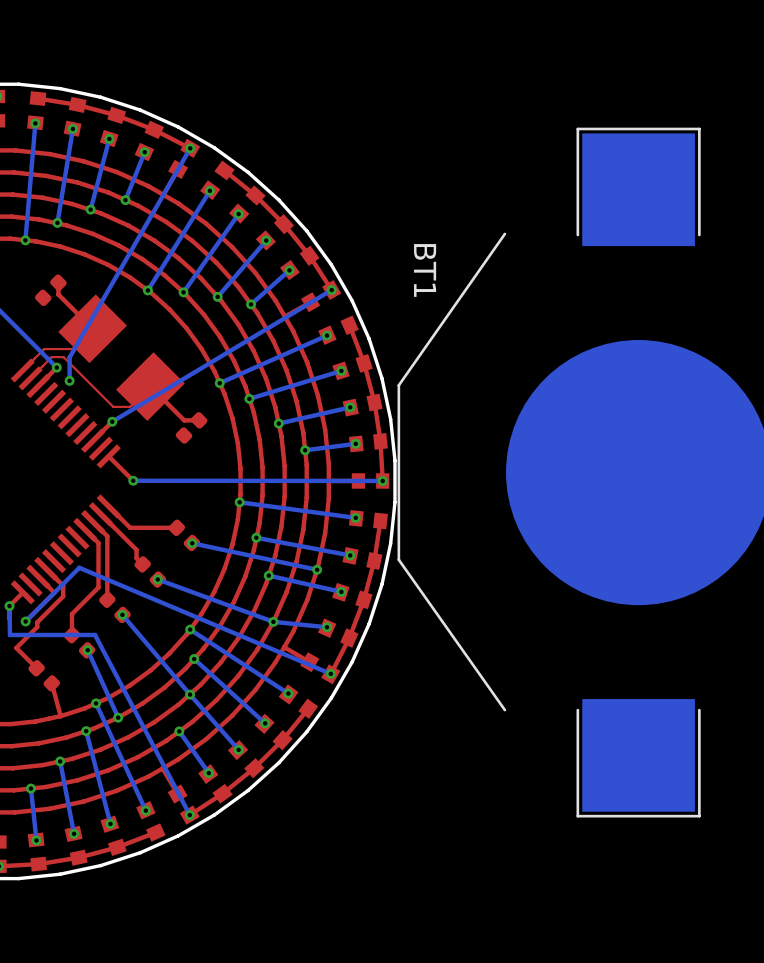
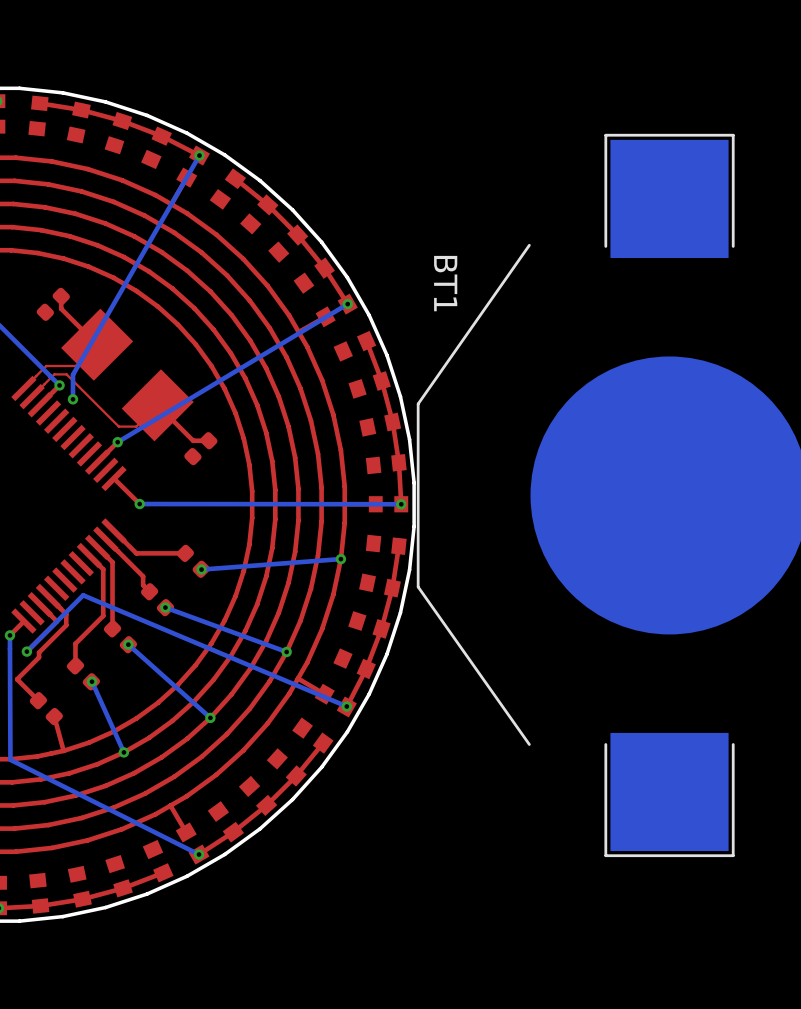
bottom track: (35, 123) (25, 240) -> none
via: (35, 123) -> none
bottom track: (72, 128) (57, 222) -> none
via: (72, 128) -> none
bottom track: (109, 138) (90, 209) -> none
via: (109, 138) -> none
bottom track: (144, 152) (125, 200) -> none
via: (144, 152) -> none
bottom track: (209, 190) (147, 290) -> none
via: (209, 190) -> none
via: (125, 200) -> none
via: (90, 209) -> none
bottom track: (238, 214) (183, 292) -> none
via: (238, 214) -> none
via: (57, 222) -> none
via: (25, 240) -> none
bottom track: (266, 240) (217, 296) -> none
via: (266, 240) -> none
bottom track: (289, 270) (251, 304) -> none
via: (289, 270) -> none
via: (147, 290) -> none
via: (183, 292) -> none
via: (217, 296) -> none
via: (251, 304) -> none
bottom track: (327, 335) (219, 383) -> none
via: (327, 335) -> none
bottom track: (341, 370) (249, 398) -> none
via: (341, 370) -> none
via: (219, 383) -> none
via: (249, 398) -> none
bottom track: (350, 407) (278, 423) -> none
via: (350, 407) -> none
via: (278, 423) -> none
bottom track: (355, 443) (305, 450) -> none
via: (355, 443) -> none
via: (305, 450) -> none
bottom track: (239, 502) (355, 517) -> none
via: (239, 502) -> none
via: (355, 517) -> none
via: none -> (340, 559)
bottom track: (256, 537) (350, 555) -> none
via: (256, 537) -> none
bottom track: (192, 543) (317, 569) -> (201, 569) (340, 559)
via: (350, 555) -> none
via: (317, 569) -> none
bottom track: (268, 575) (341, 591) -> none
via: (268, 575) -> none
via: (341, 591) -> none
bottom track: (9, 606) (9, 634) (95, 634) (189, 815) -> (9, 648) (10, 759) (199, 854)
bottom track: (122, 614) (238, 749) -> (128, 644) (210, 717)
bottom track: (273, 621) (327, 627) -> none
via: (327, 627) -> none
bottom track: (190, 629) (288, 693) -> none
via: (190, 629) -> none
bottom track: (194, 659) (265, 723) -> none
via: (194, 659) -> none
via: none -> (210, 717)
via: (288, 693) -> none
via: (190, 694) -> none
bottom track: (96, 703) (145, 810) -> none
via: (96, 703) -> none
via: (265, 723) -> none
bottom track: (86, 731) (110, 823) -> none
via: (86, 731) -> none
bottom track: (179, 731) (208, 773) -> none
via: (179, 731) -> none
via: (238, 749) -> none
bottom track: (60, 761) (74, 833) -> none
via: (60, 761) -> none
via: (208, 773) -> none
bottom track: (30, 788) (36, 840) -> none
via: (30, 788) -> none
via: (145, 810) -> none
via: (110, 823) -> none
via: (74, 833) -> none
via: (36, 840) -> none

